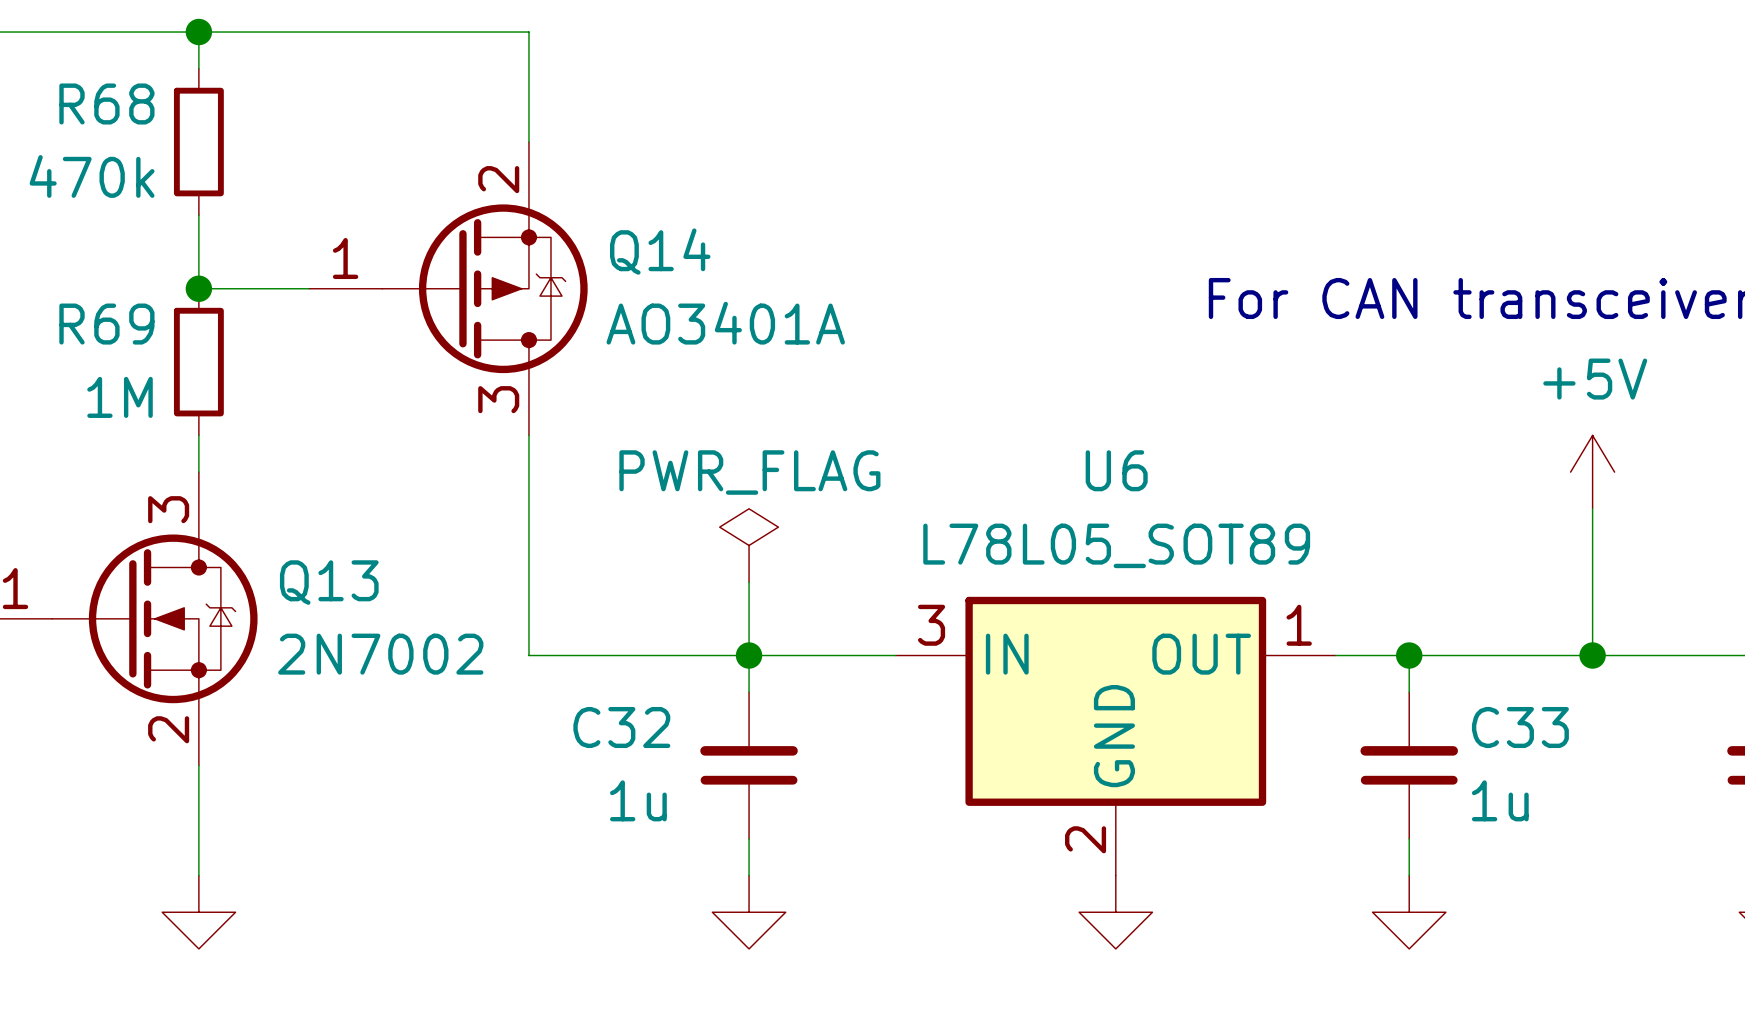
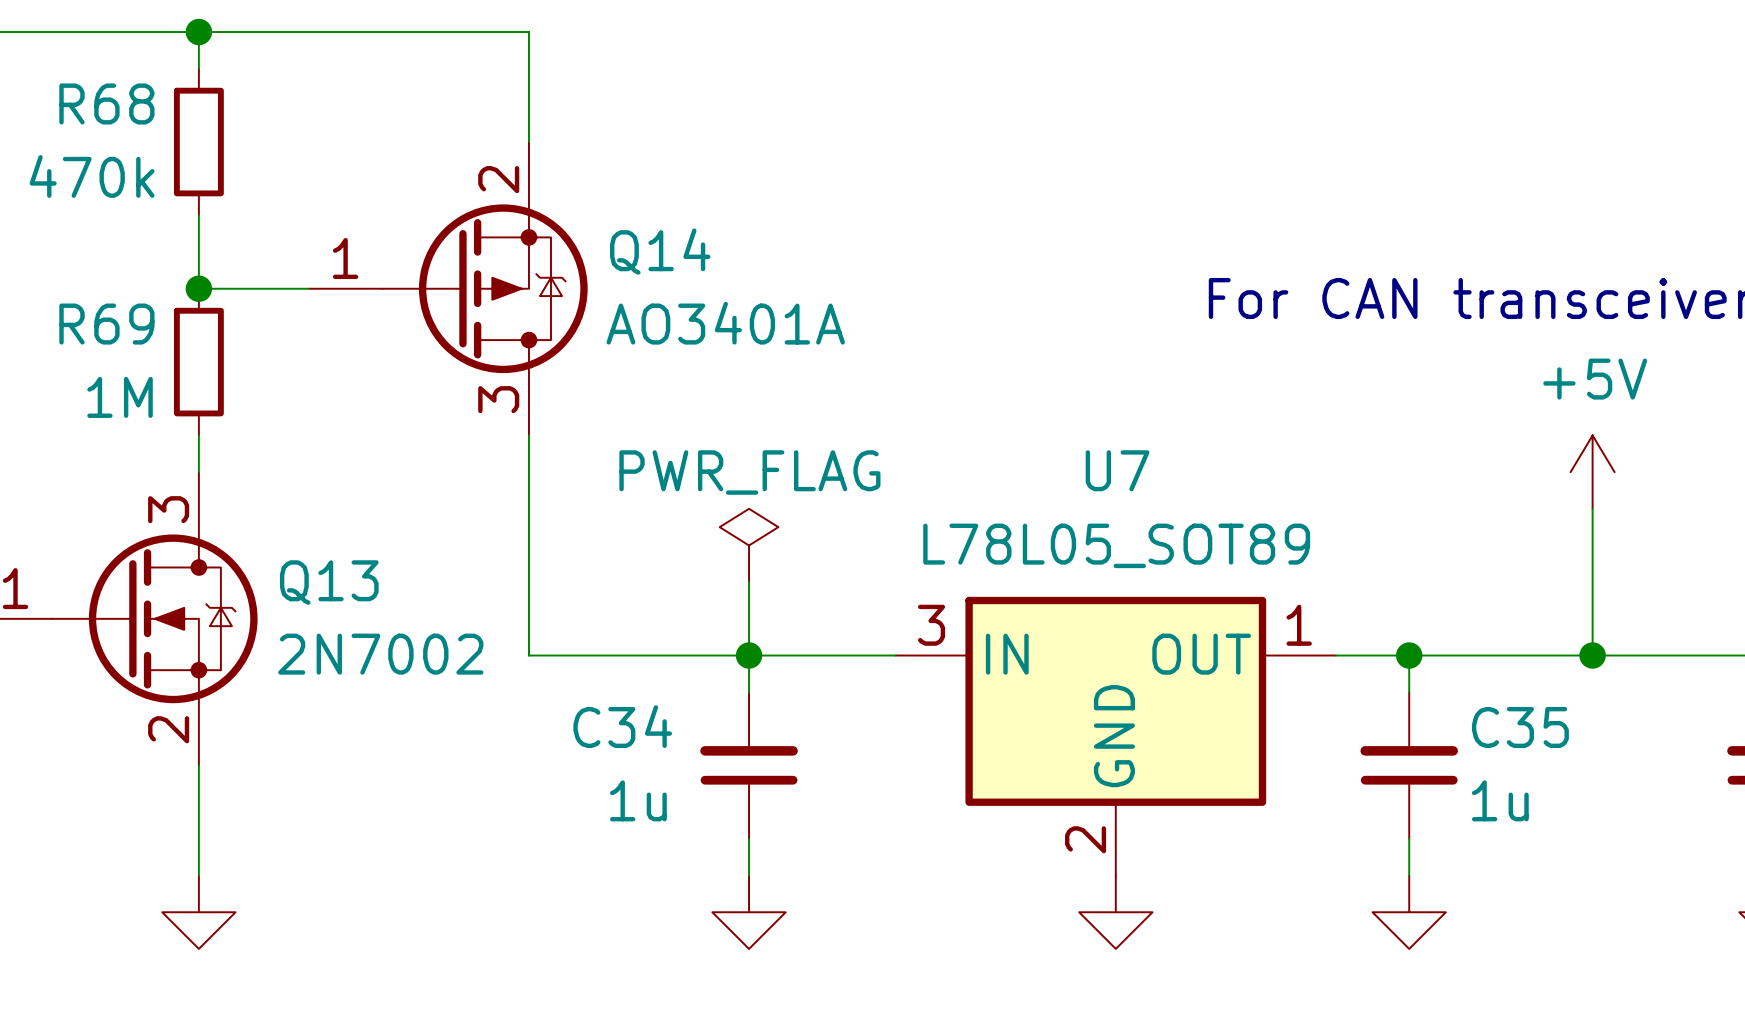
U6 name: U6 (1116, 470) -> U7 (1117, 470)
C32 name: C32 (621, 727) -> C34 (622, 726)
C33 name: C33 (1520, 727) -> C35 (1520, 727)

